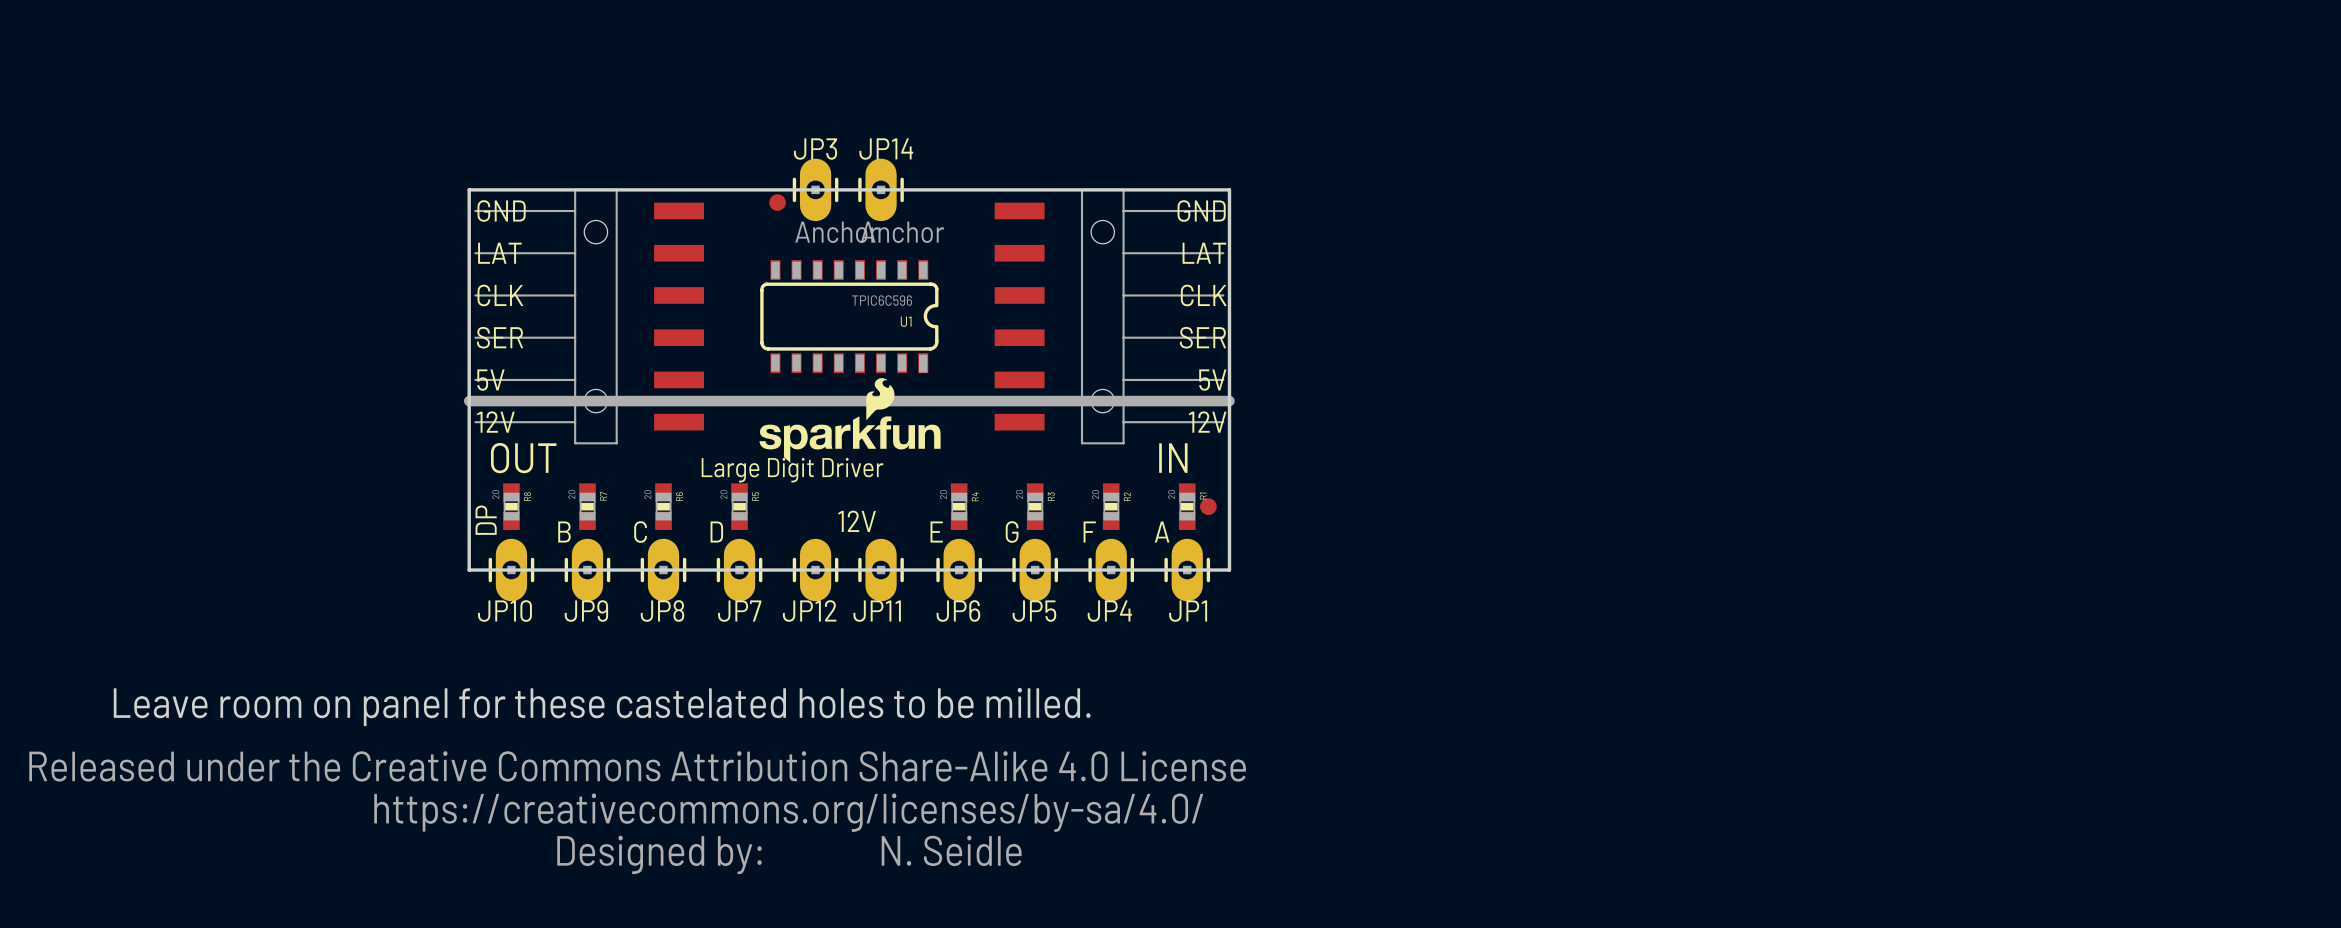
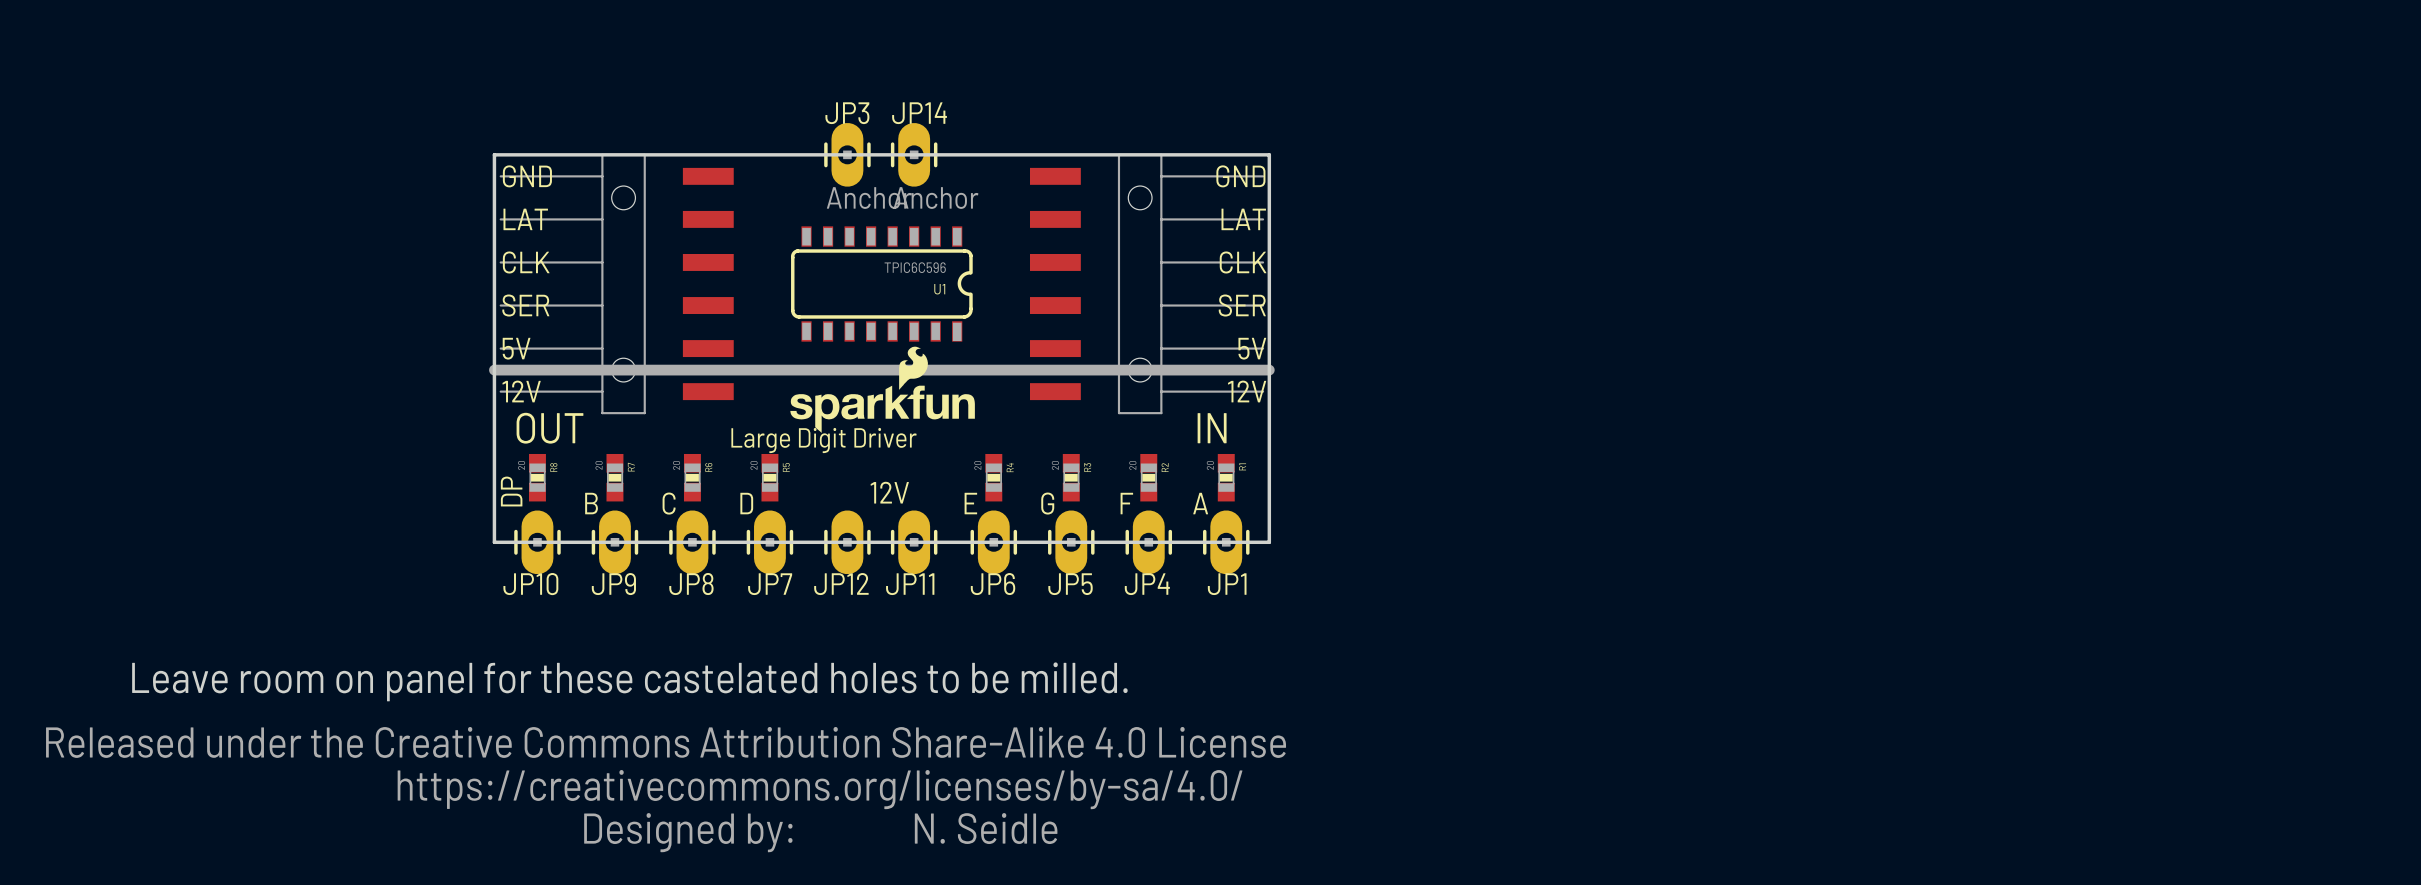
part: (777, 202) -> none
part: (1208, 506) -> none

